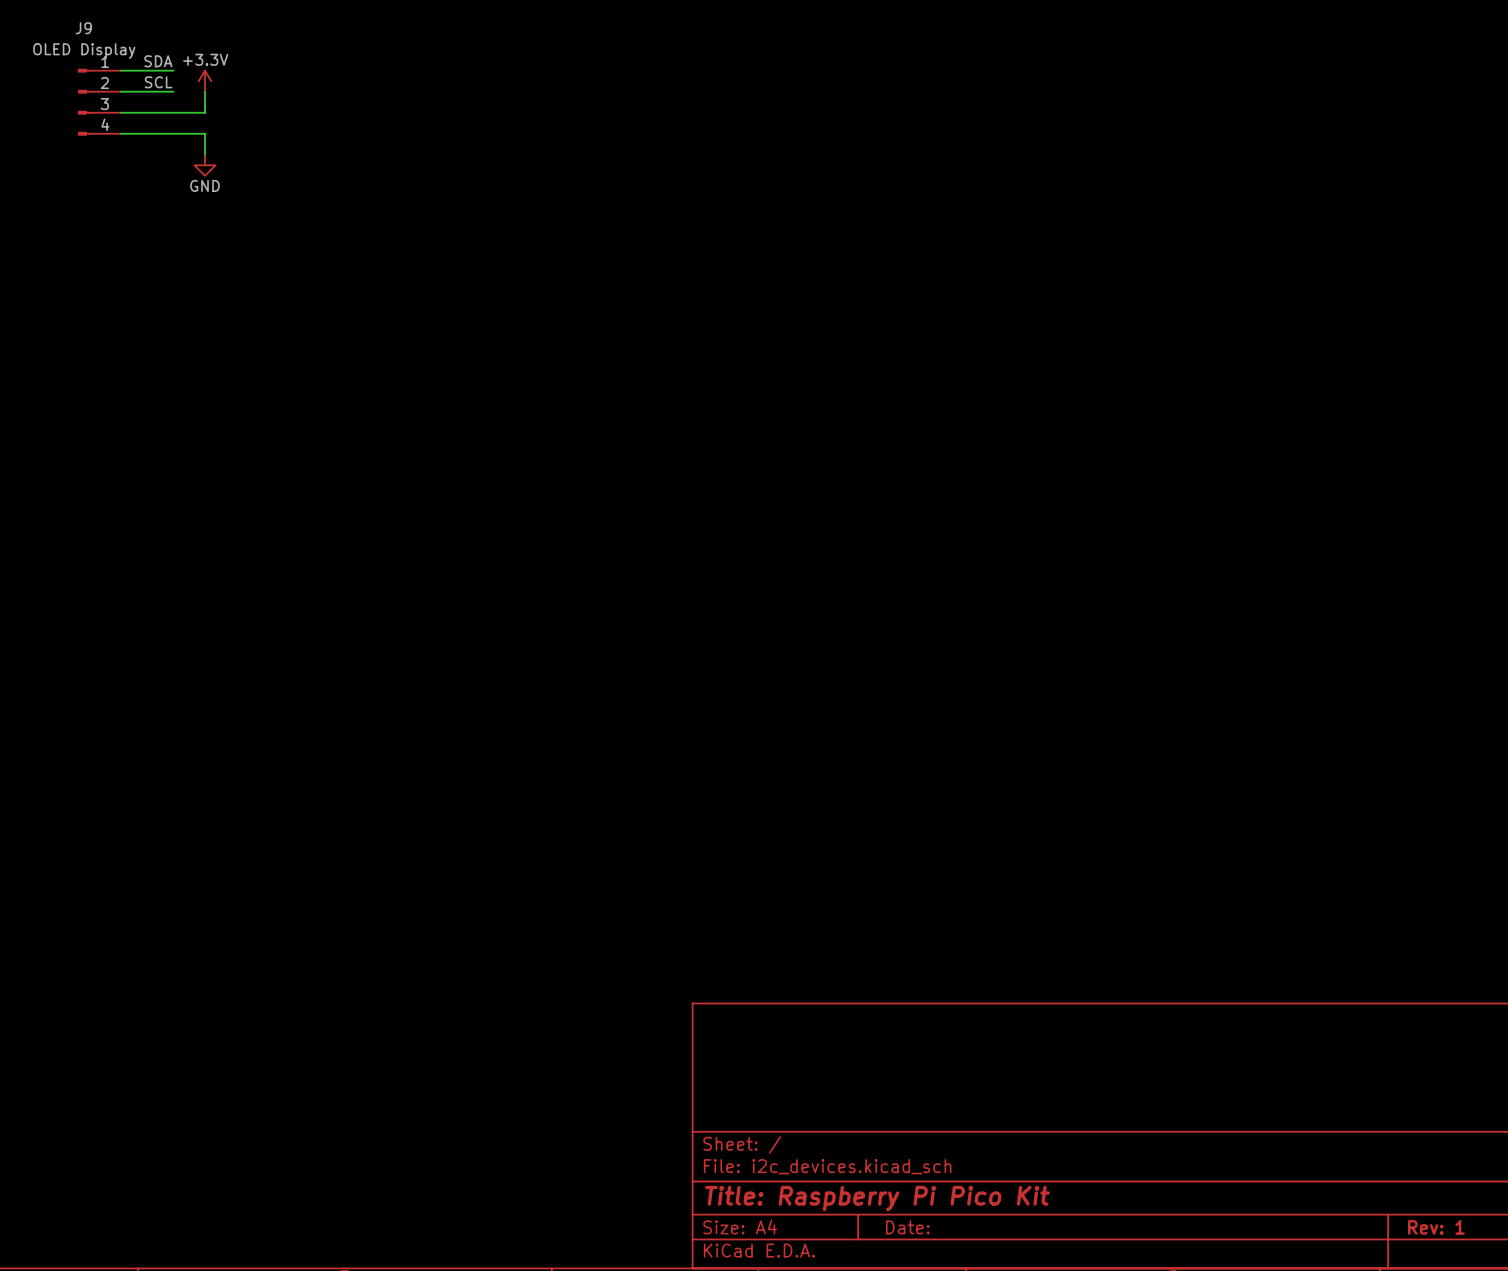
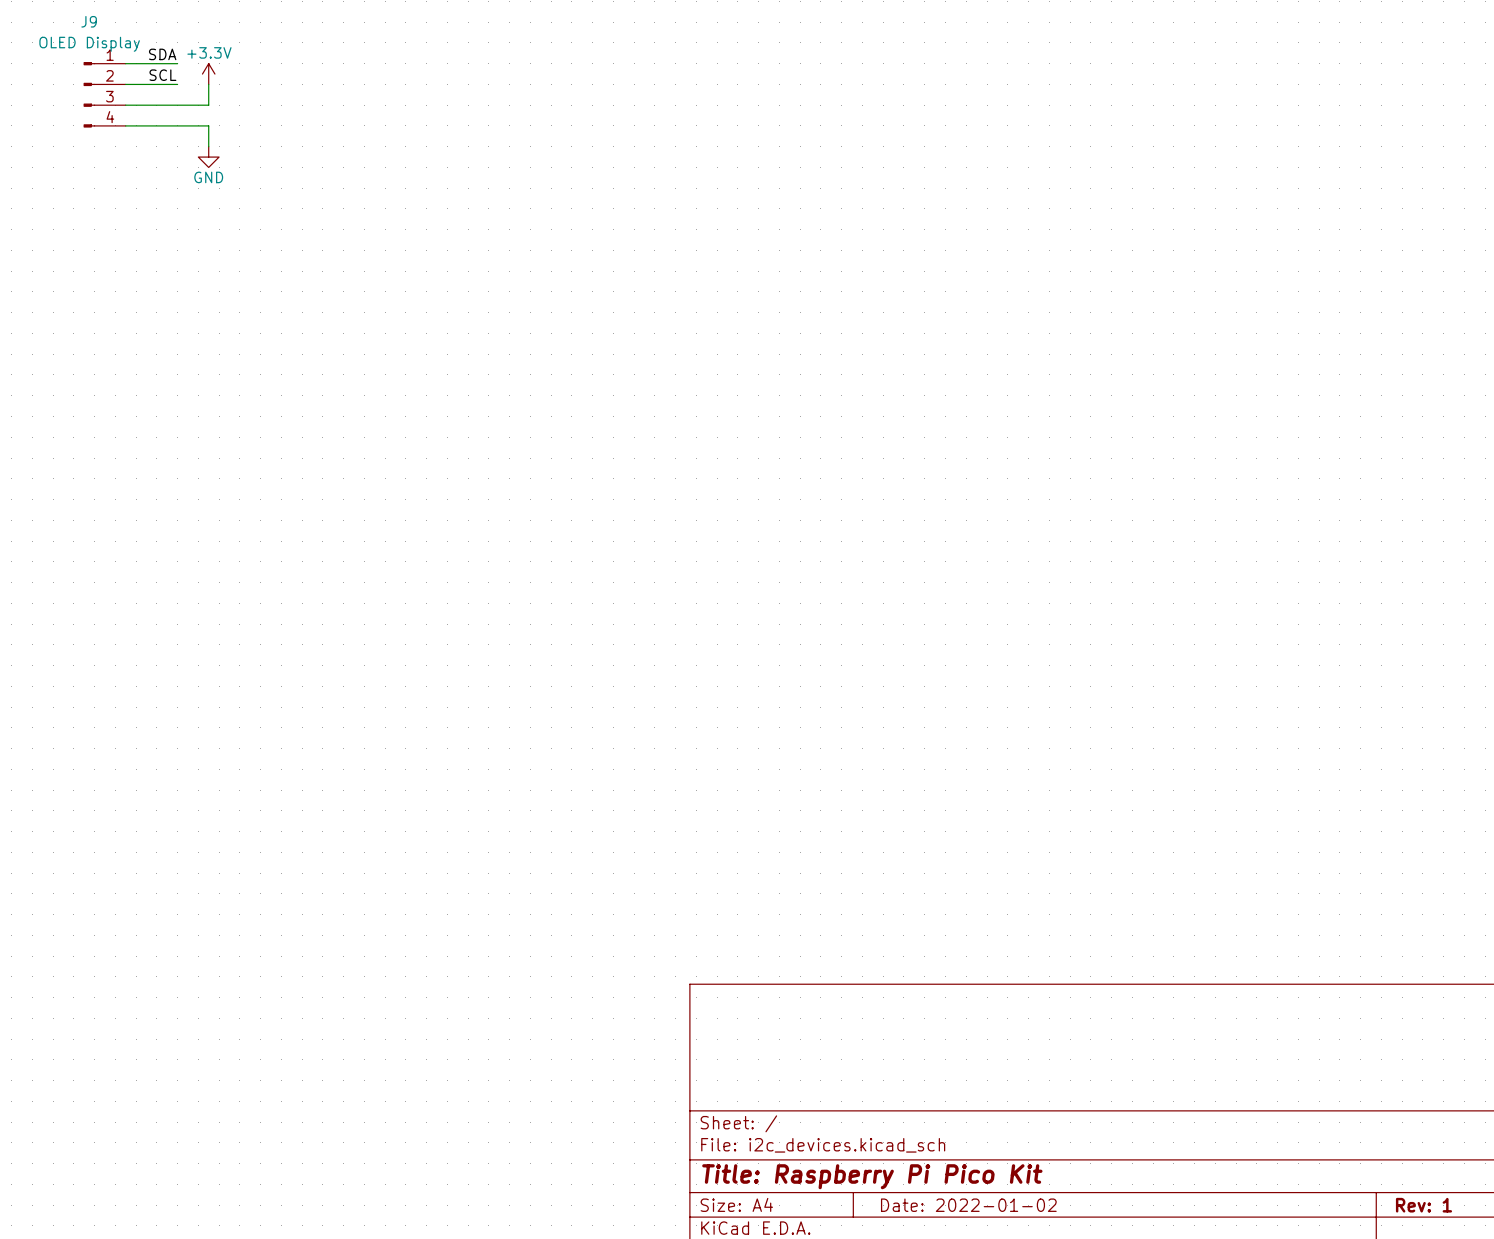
title block: Date: (907, 1227) -> Date: 2022-01-02 (968, 1205)

